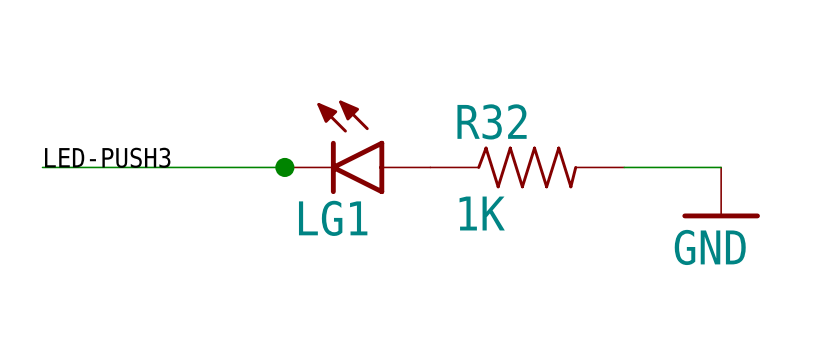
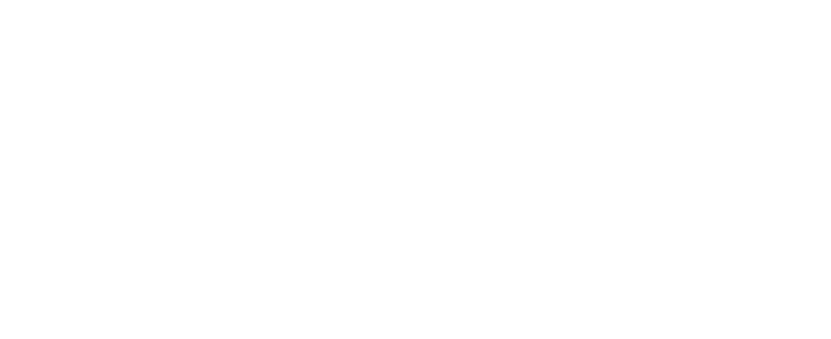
LG1: (357, 147) -> none
label: LED-PUSH3 (107, 157) -> none
wire: (42, 167) (284, 167) -> none
junction: (284, 167) -> none
R32: 1K (527, 167) -> none
wire: (624, 167) (721, 167) -> none
power symbol: GND (721, 192) -> none

